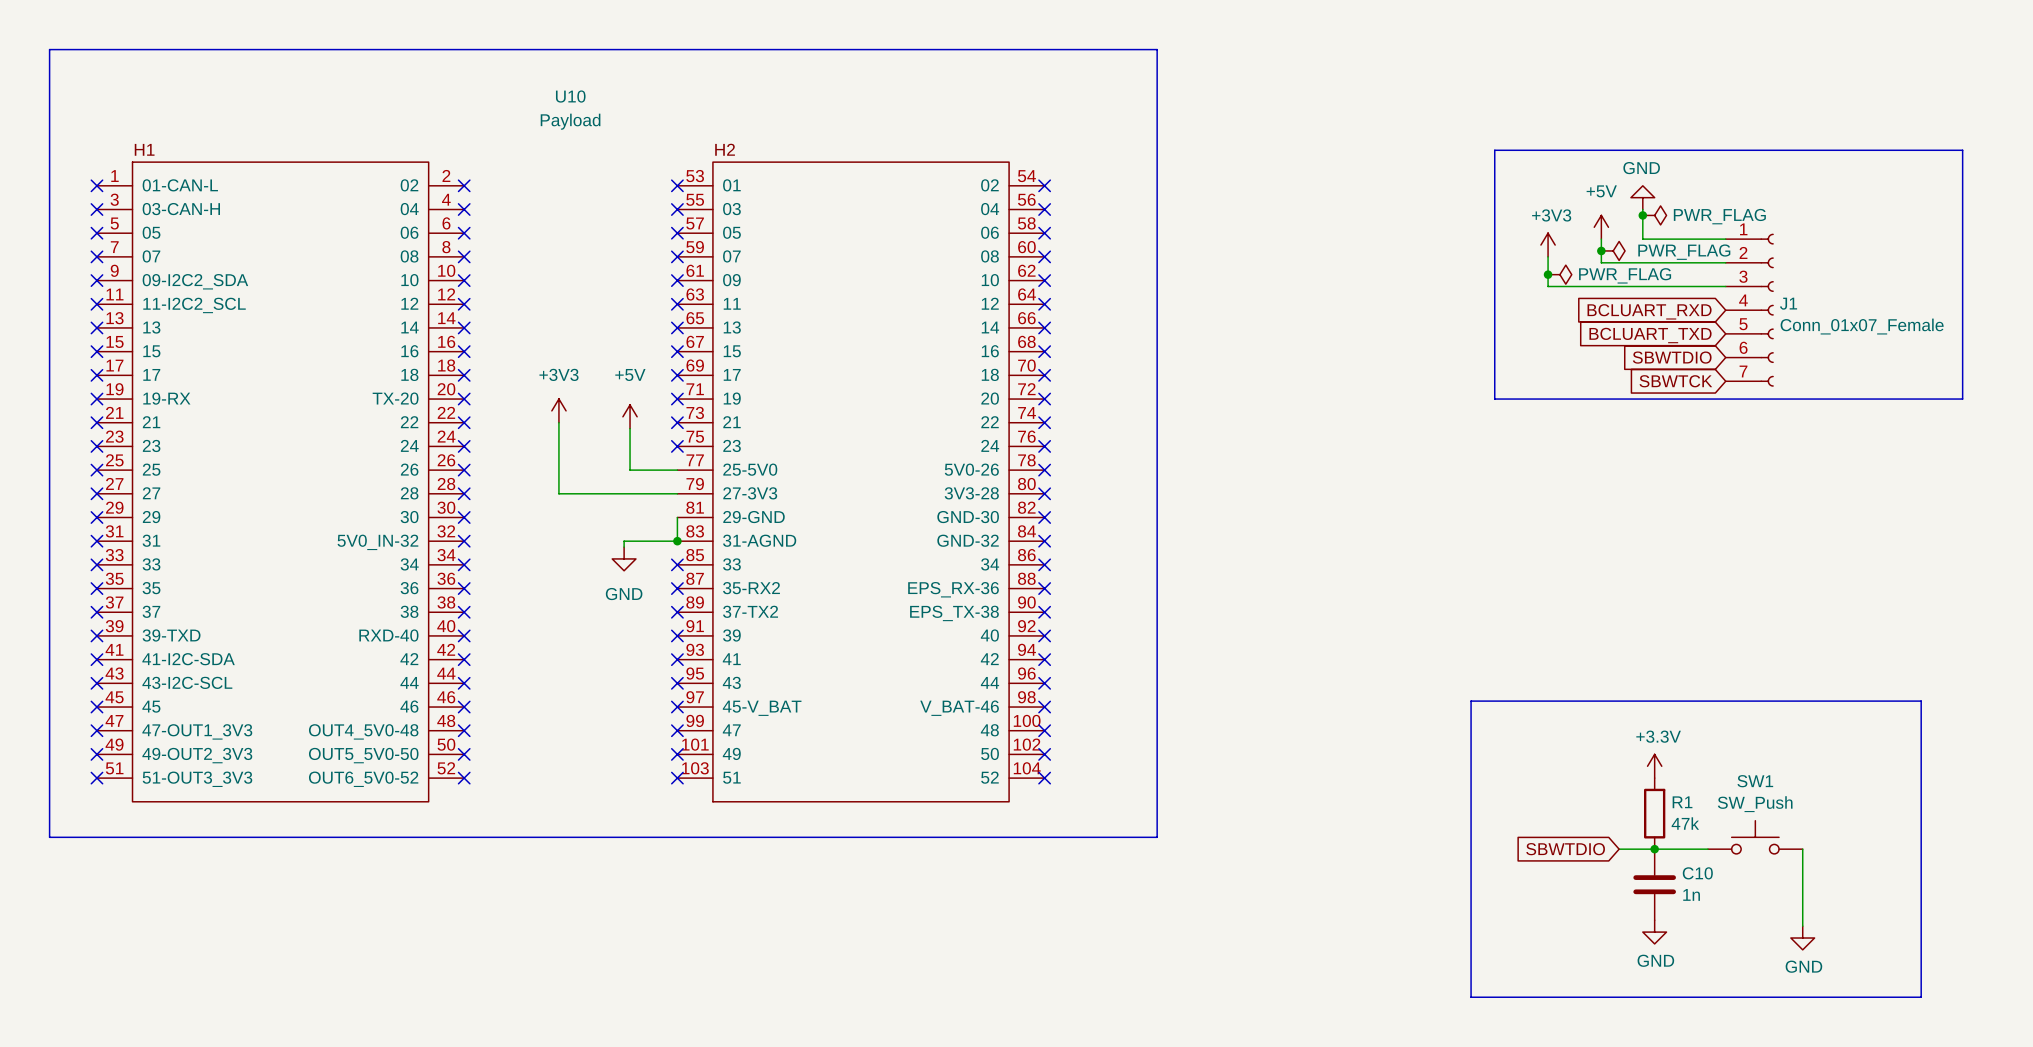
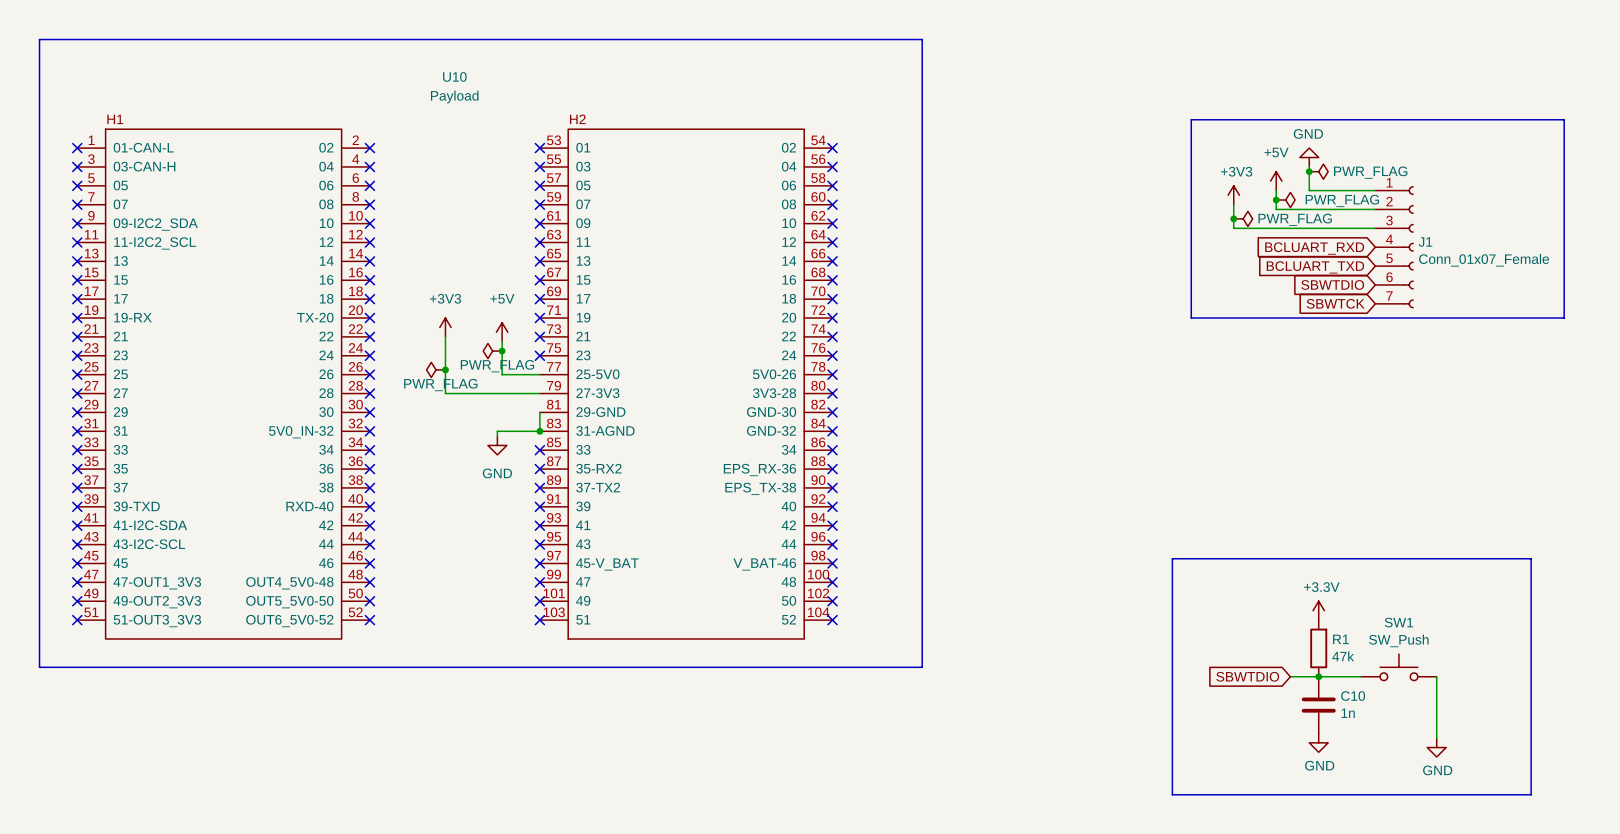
power symbol: none -> PWR_FLAG (492, 351)
junction: none -> (502, 351)
power symbol: none -> PWR_FLAG (436, 369)
junction: none -> (445, 369)

